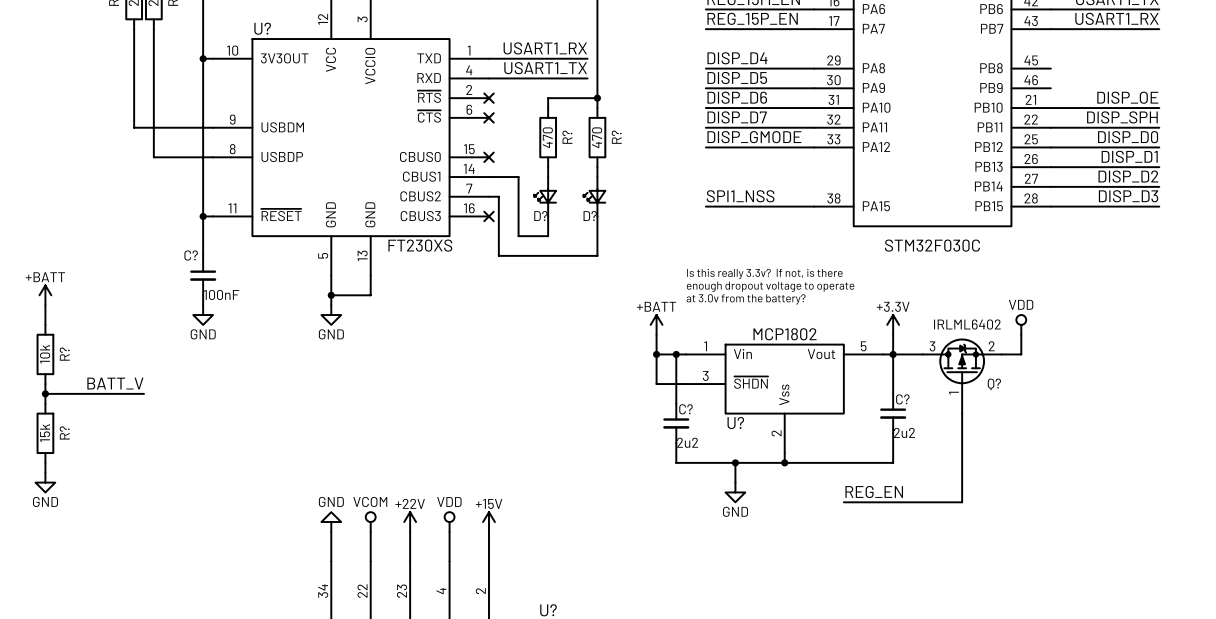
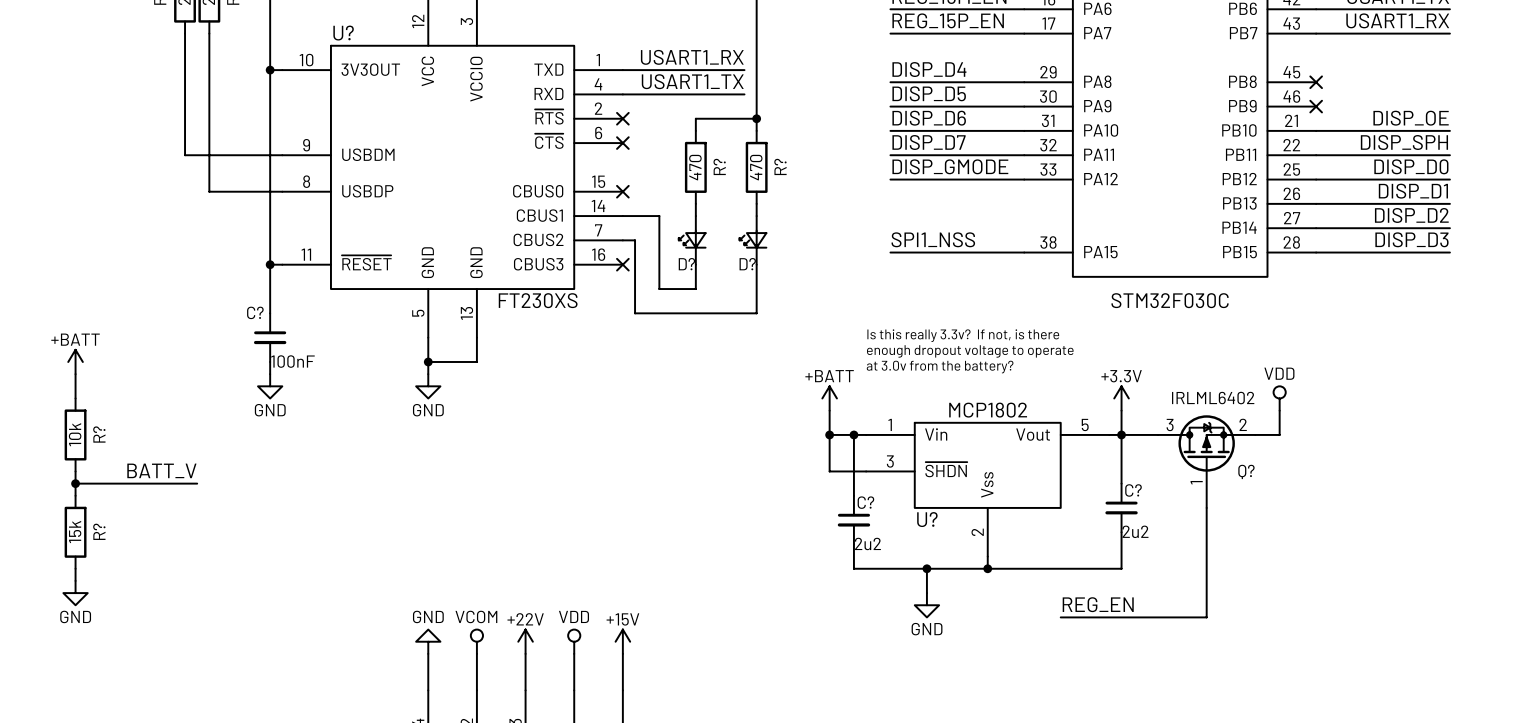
no-connect mark: none -> (1316, 82)
no-connect mark: none -> (1316, 106)

